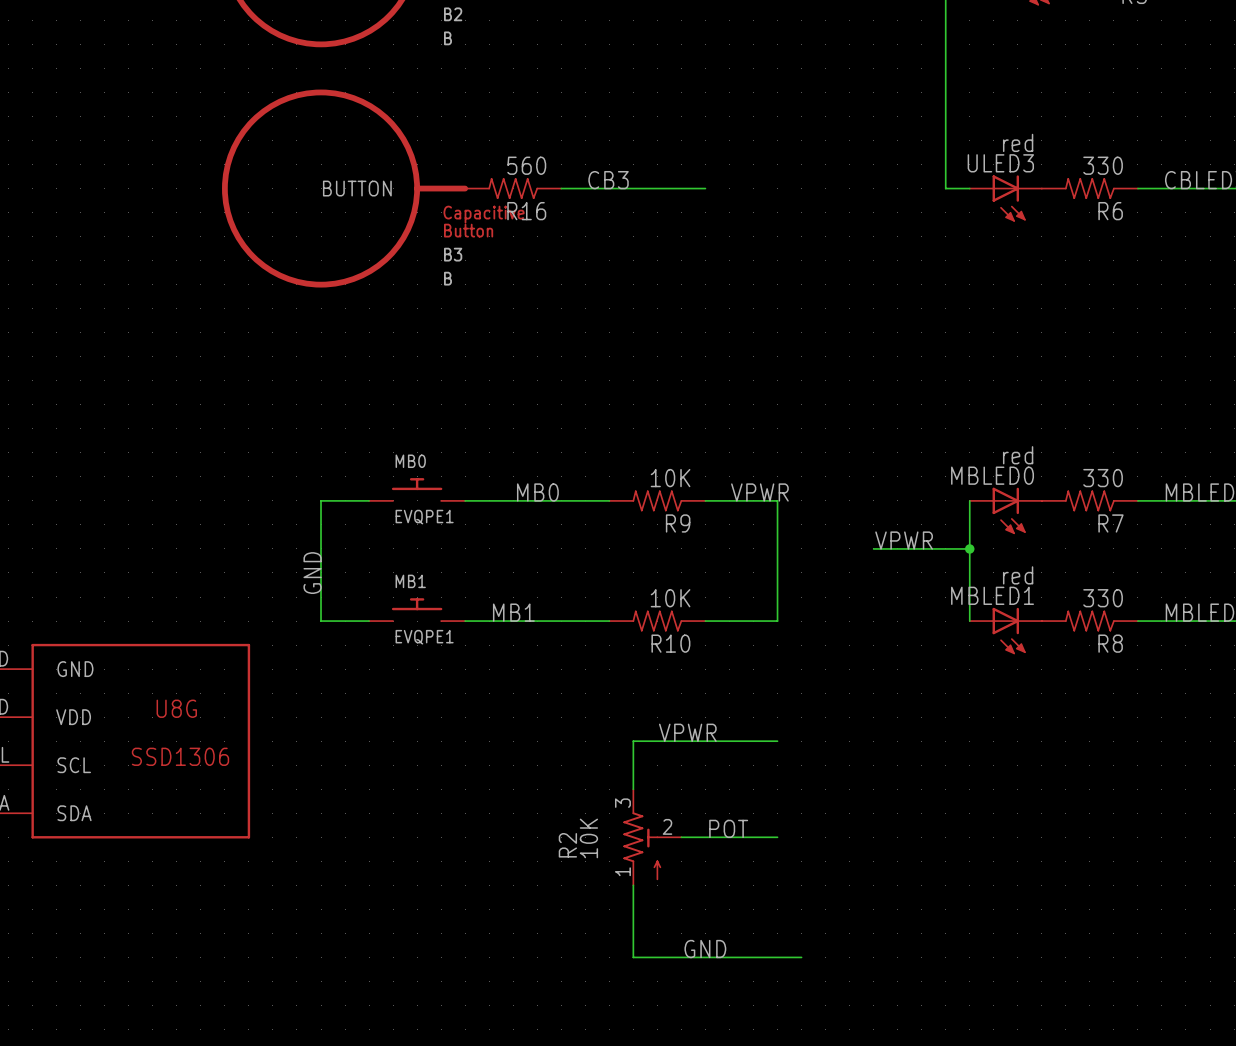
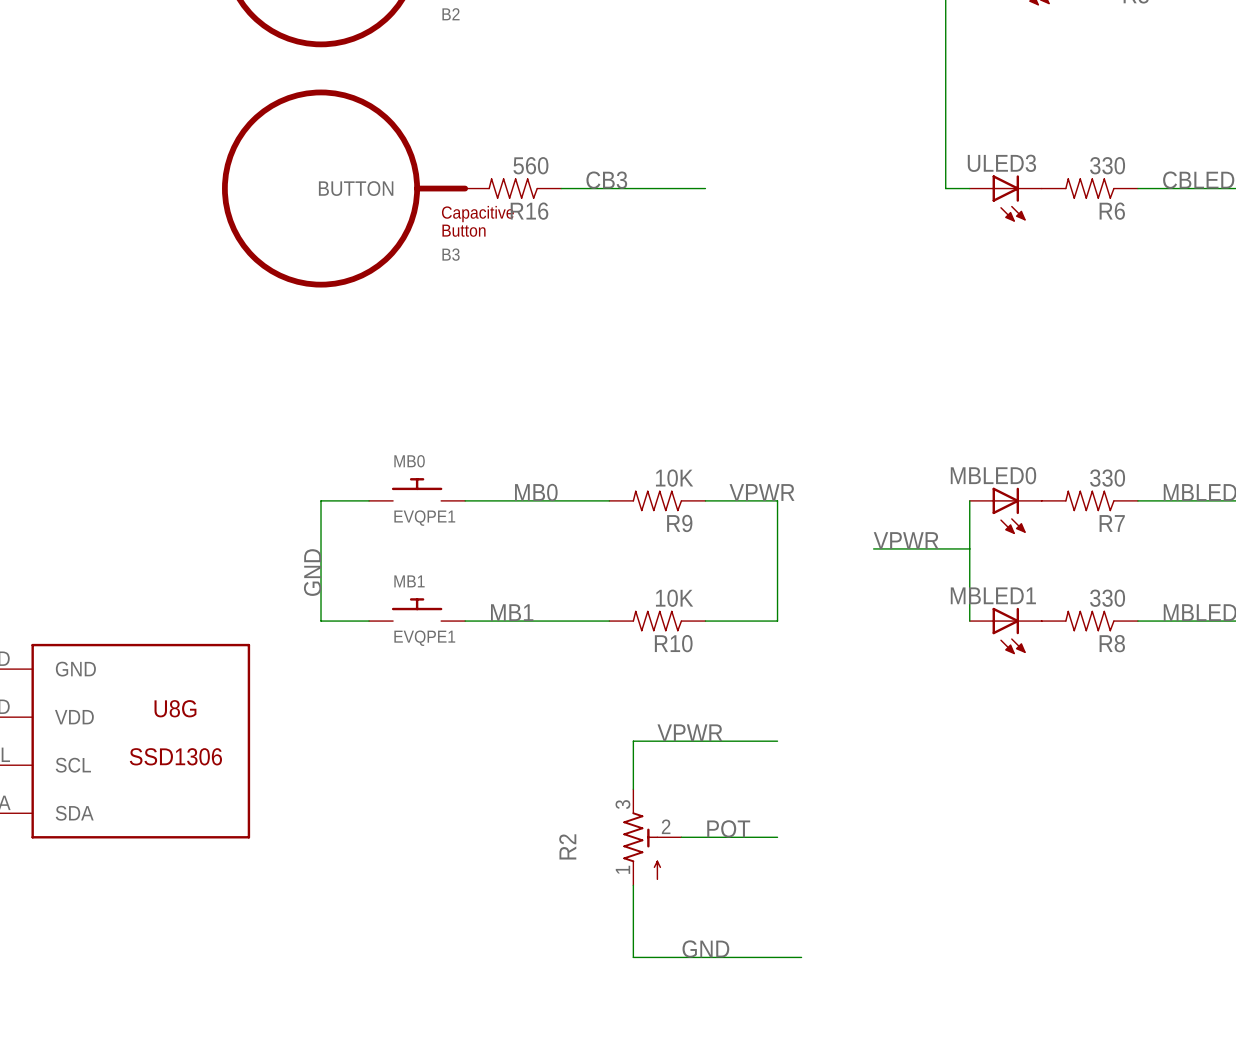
B2 value: B (447, 38) -> none
ULED3 value: red (1018, 142) -> none
B3 value: B (447, 278) -> none
MBLED0 value: red (1018, 455) -> none
junction: (969, 548) -> none
MBLED1 value: red (1018, 575) -> none
R2 value: 10K (588, 838) -> none

